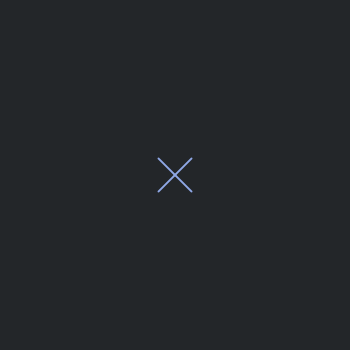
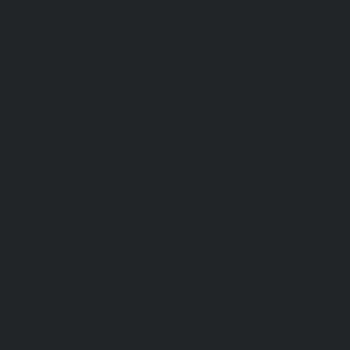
no-connect mark: (175, 175) -> none

